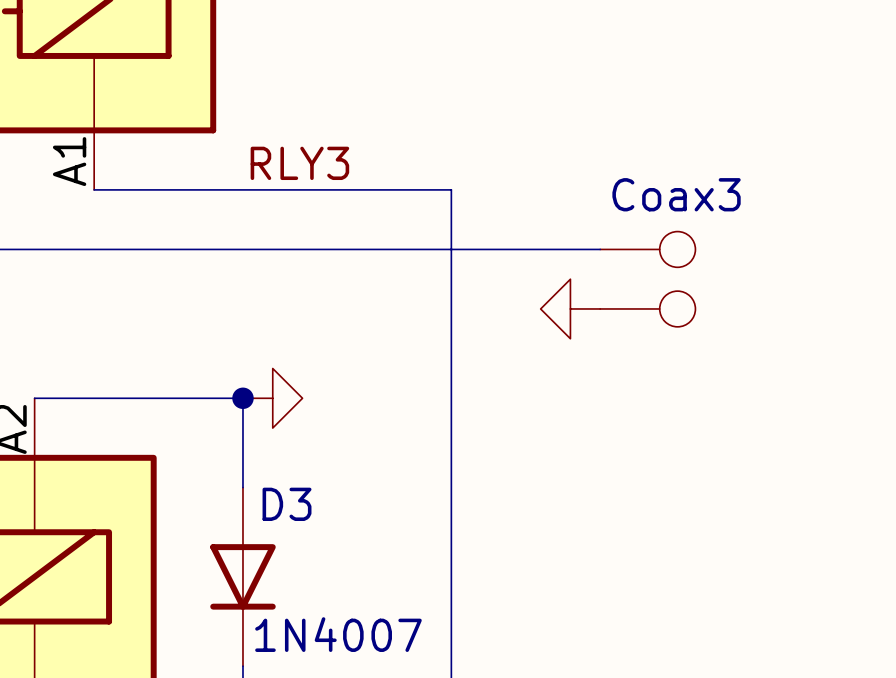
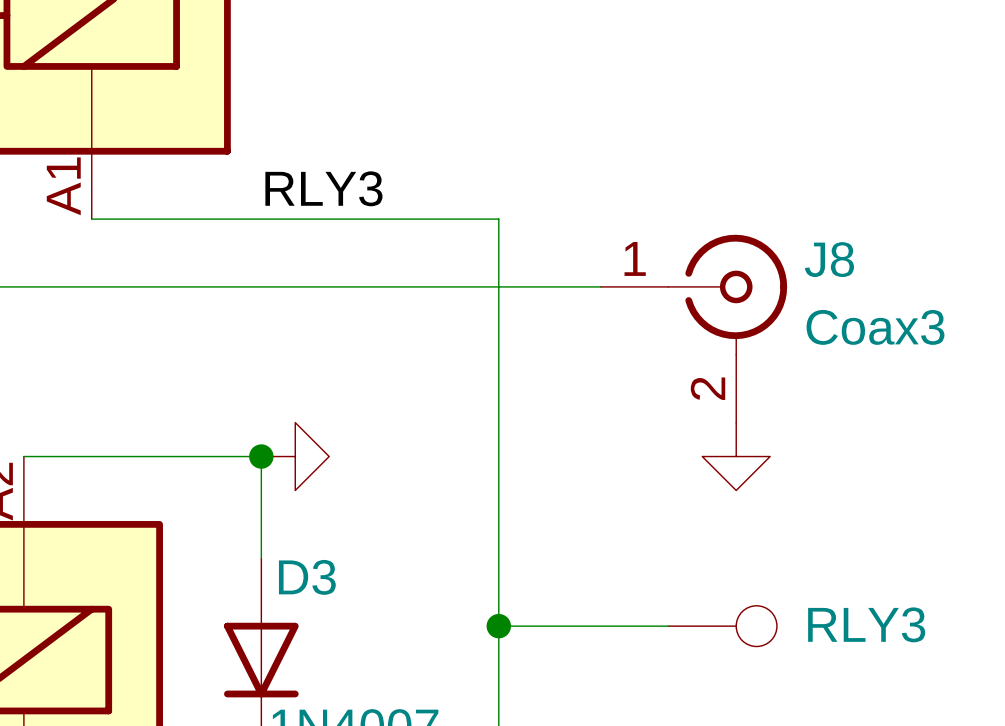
part: Coax3 (647, 249) -> none
J8: none -> Coax3 (693, 328)
power symbol rotation: 0° (570, 308) -> 90° counterclockwise (736, 456)
power symbol position: (570, 308) -> (736, 456)
part: (647, 308) -> none
wire: none -> (498, 626) (668, 626)
junction: none -> (498, 626)
RLY3: none -> (722, 626)

